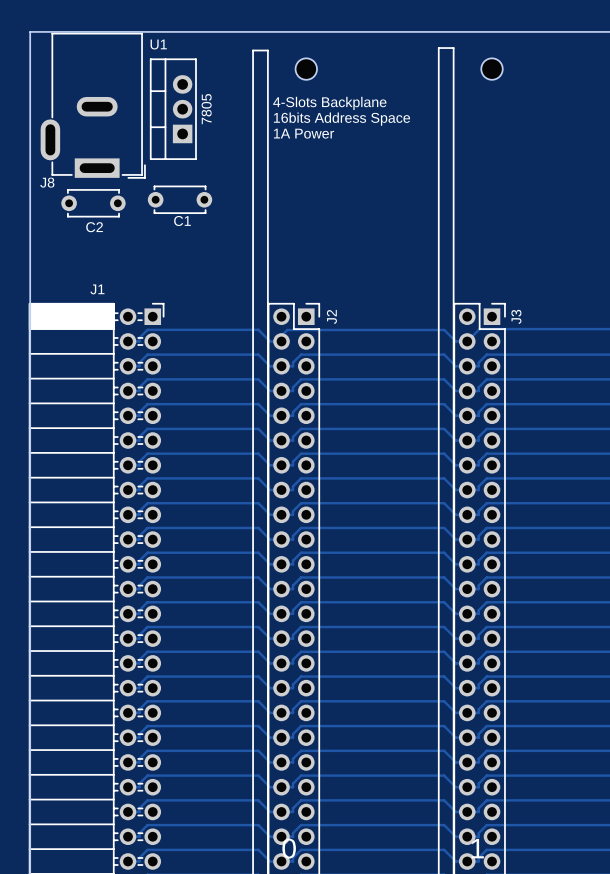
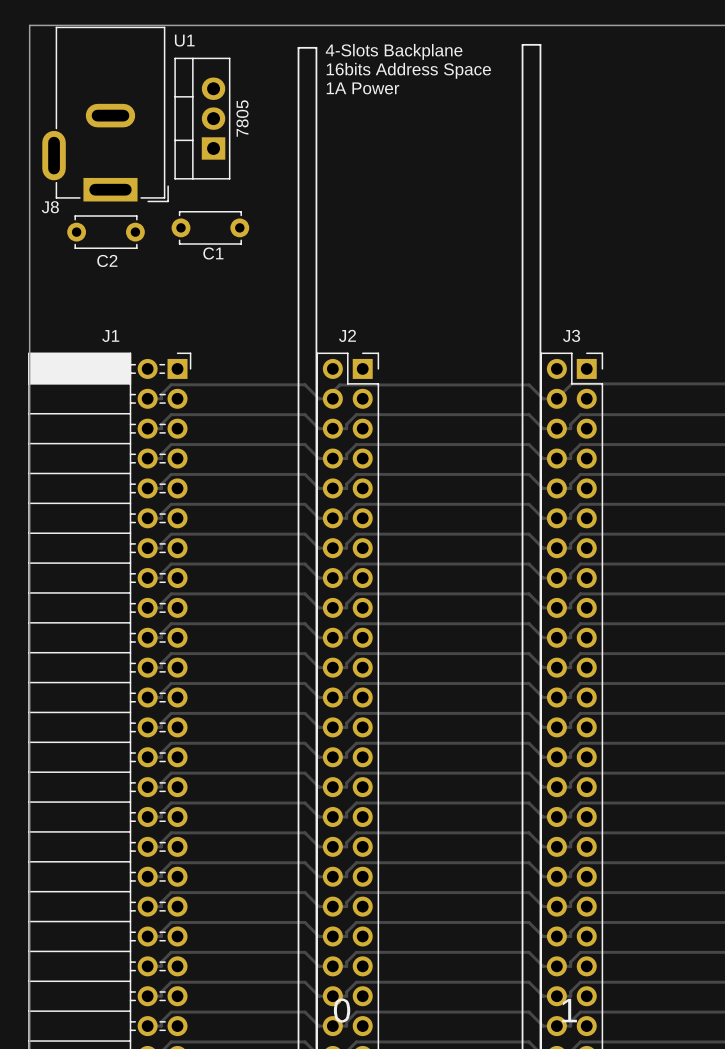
part: (306, 69) -> none
part: (492, 69) -> none
text position: 4-Slots Backplane (329, 103) -> 4-Slots Backplane (394, 51)
text position: 16bits Address Space (342, 119) -> 16bits Address Space (408, 70)
text position: 1A Power (304, 133) -> 1A Power (362, 88)
J2 name rotation: 0° (331, 316) -> 90° clockwise (347, 335)
J2 name position: J2 (331, 316) -> J2 (347, 335)
J3 name rotation: 0° (516, 316) -> 90° clockwise (571, 335)
J3 name position: J3 (516, 316) -> J3 (571, 335)

